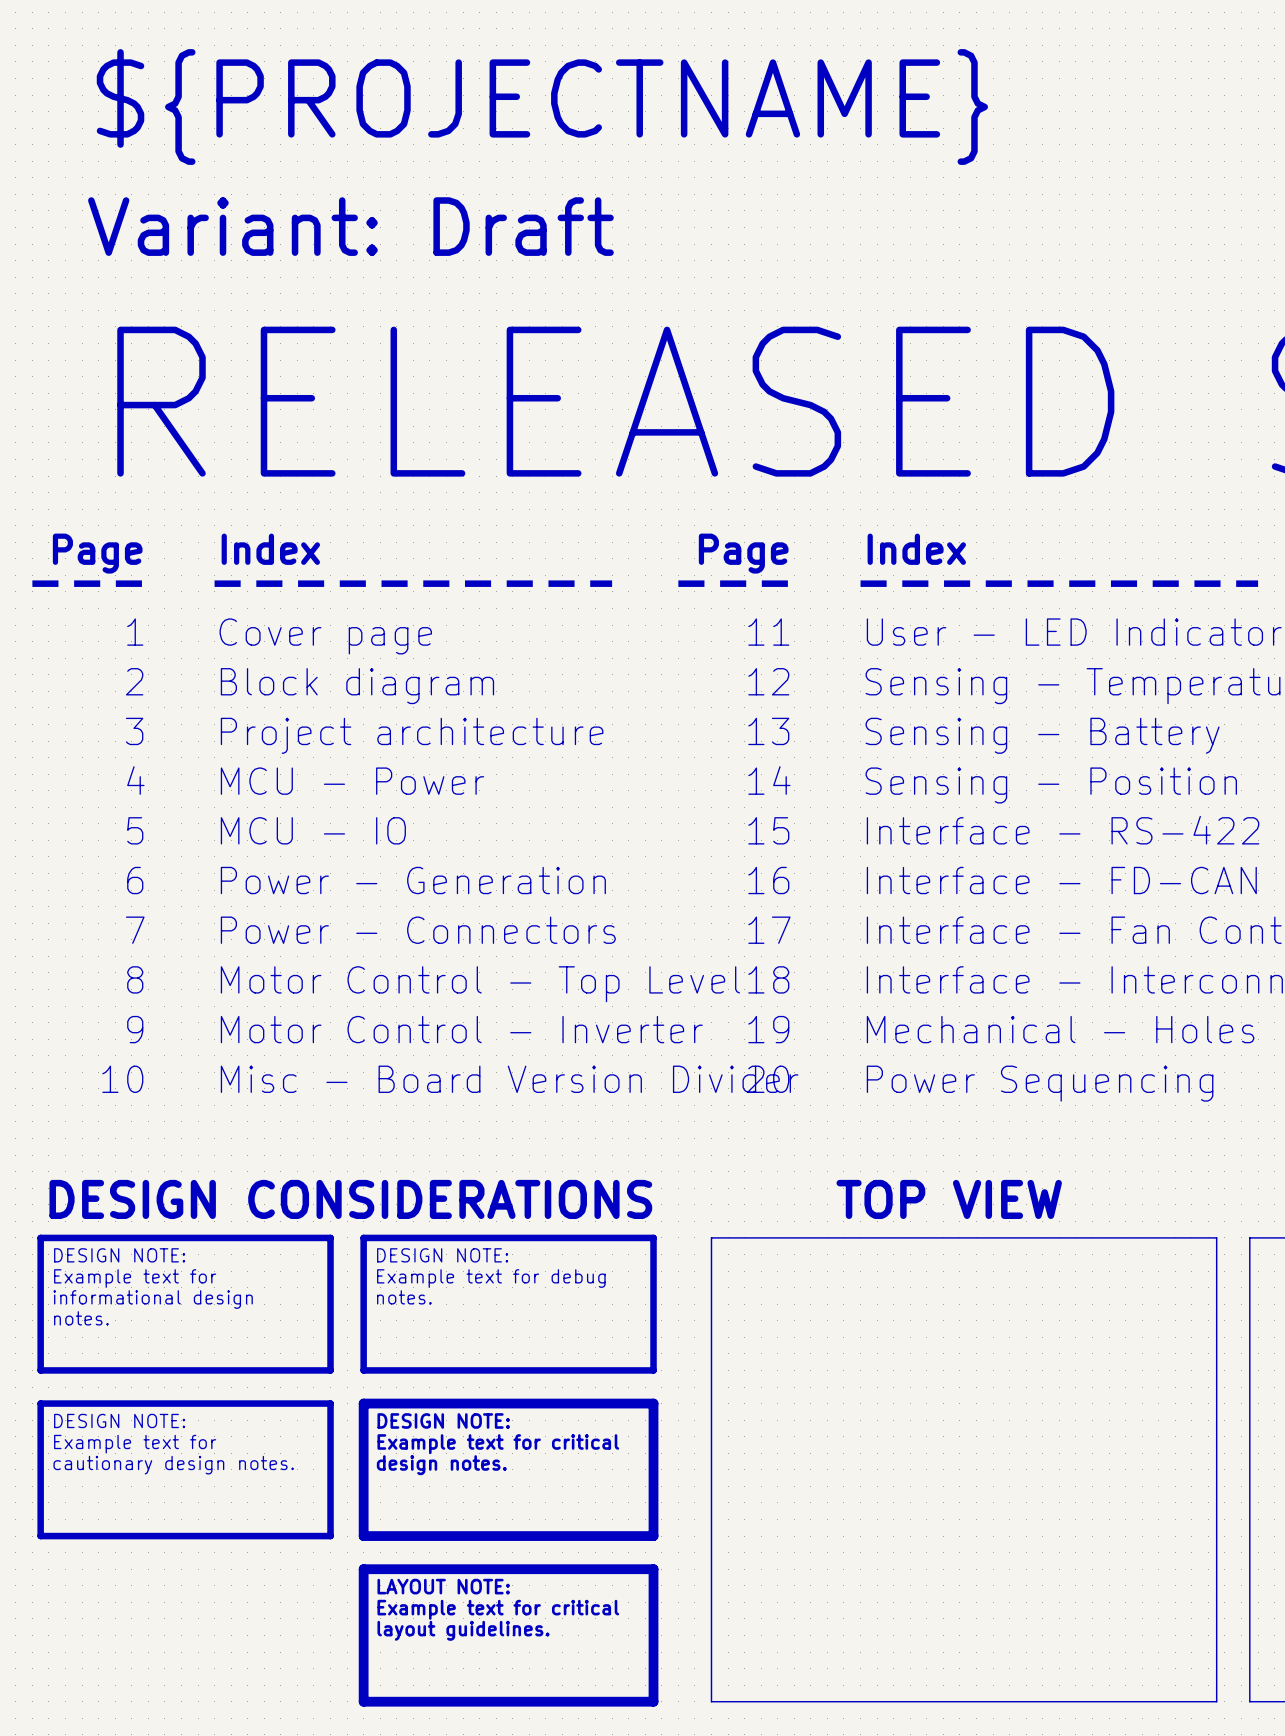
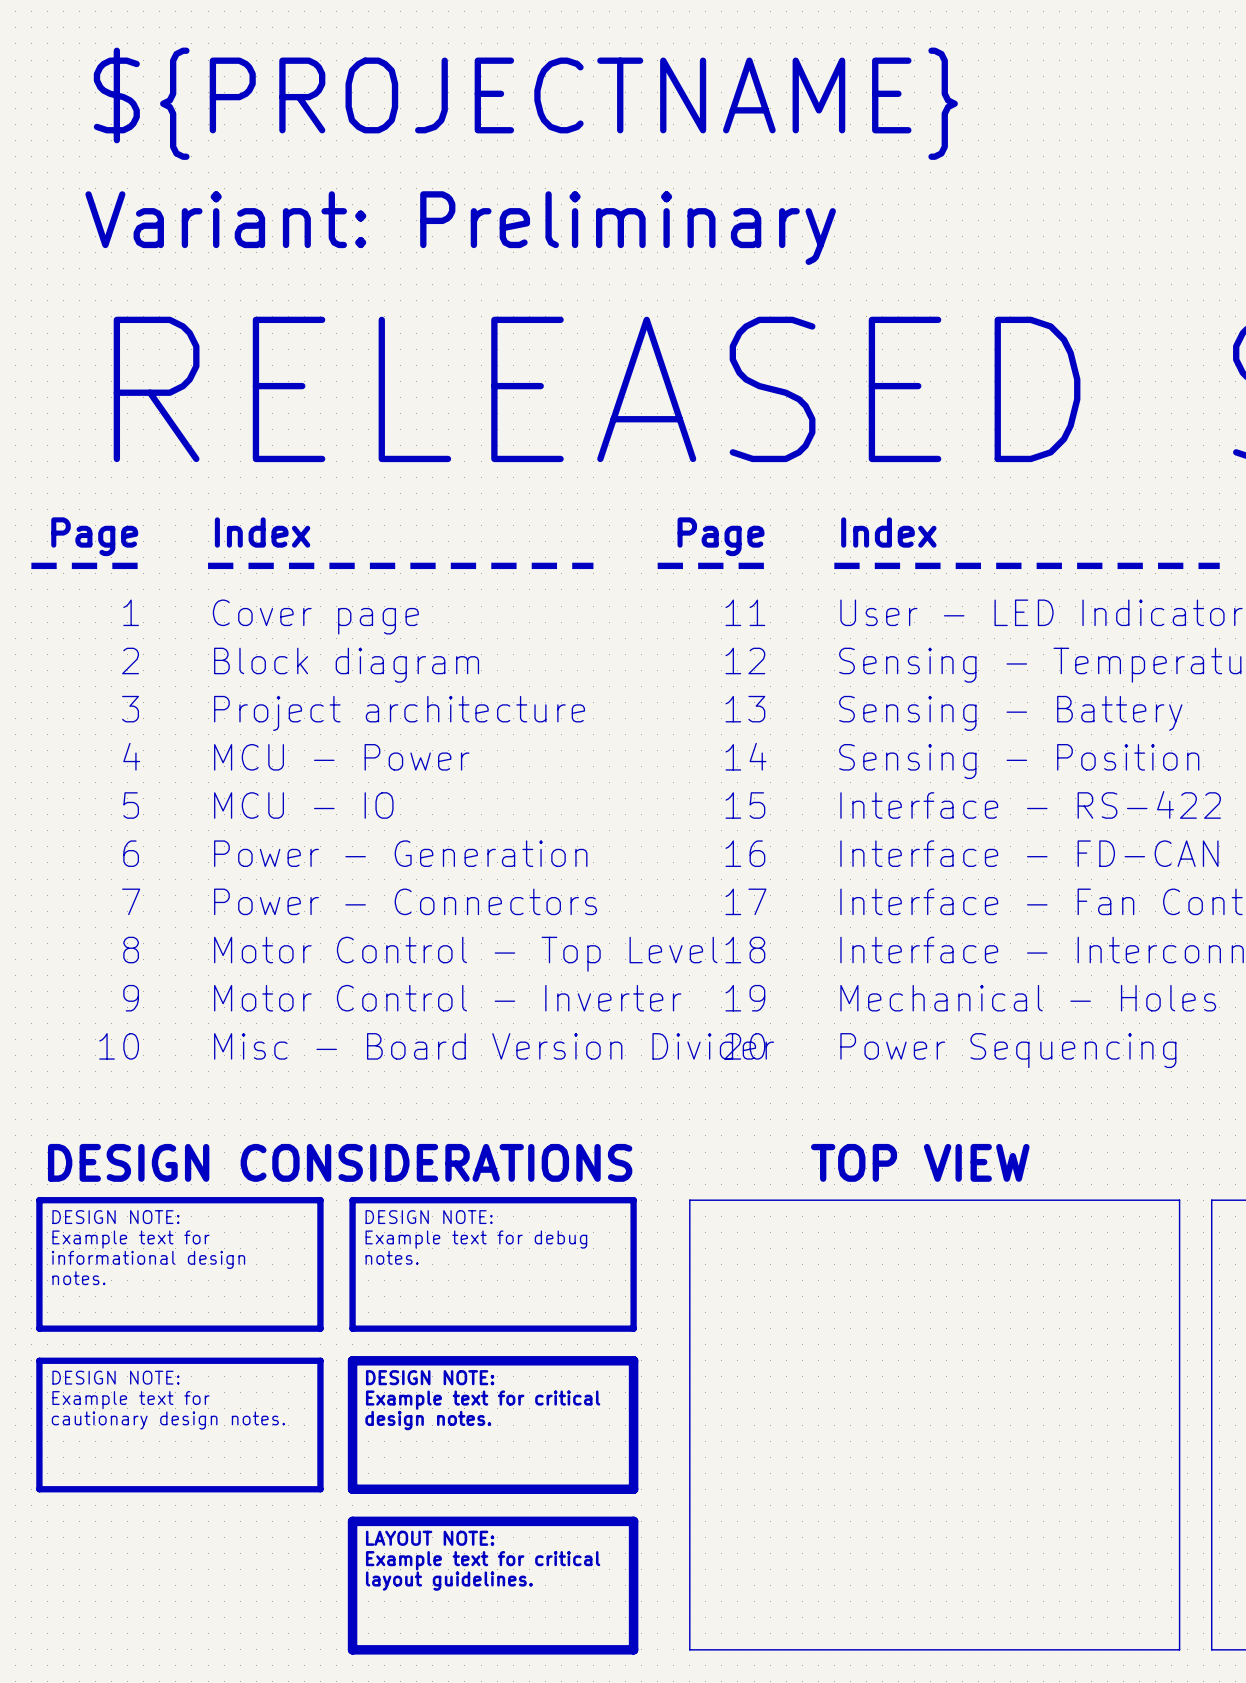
text: Variant: Draft (350, 226) -> Variant: Preliminary (460, 228)

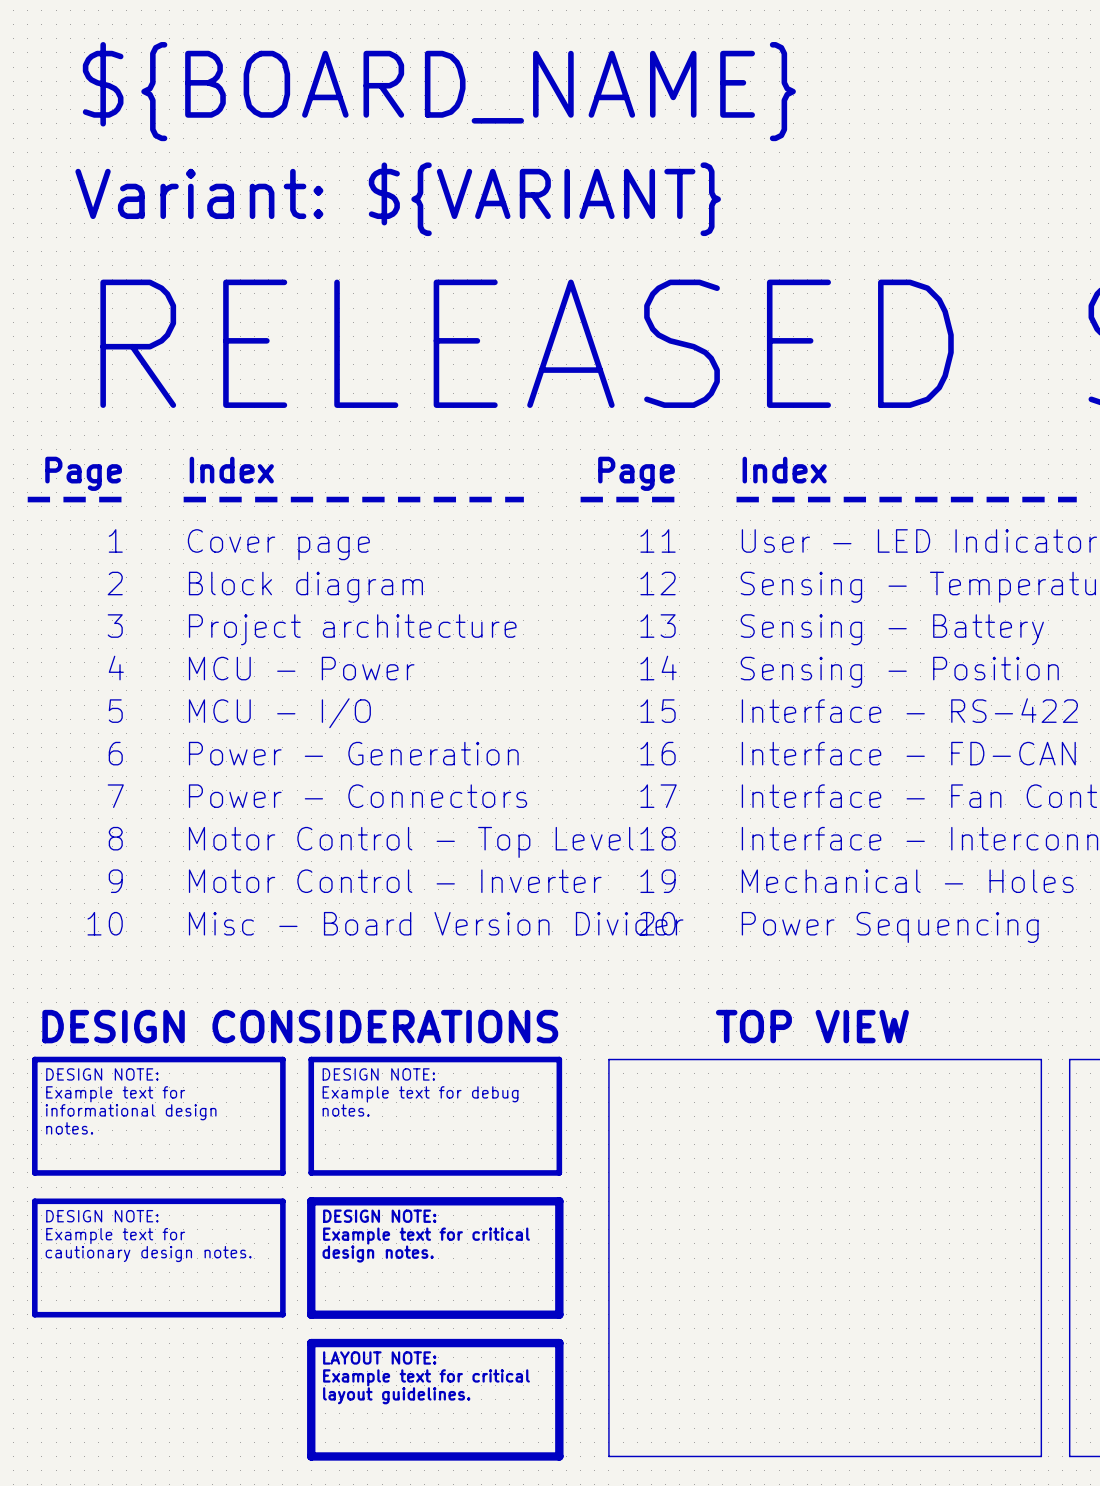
text: ${PROJECTNAME} (525, 103) -> ${BOARD_NAME} (439, 91)
text: Variant: Preliminary (460, 228) -> Variant: ${VARIANT} (398, 199)
text: MCU - IO (303, 805) -> MCU - I/O (279, 713)

